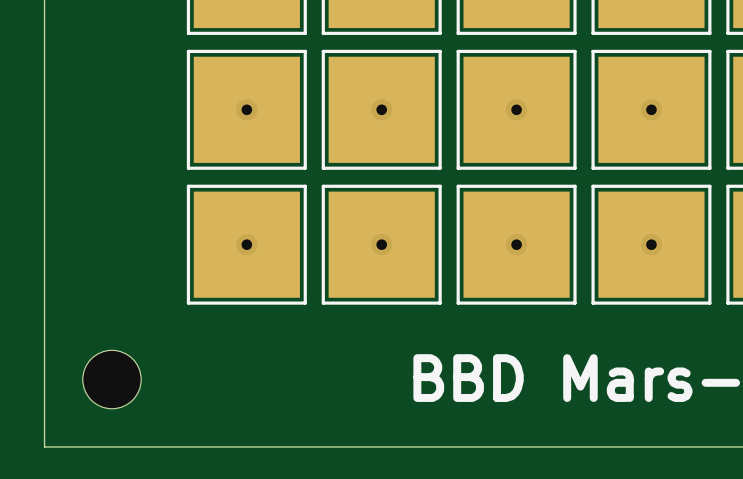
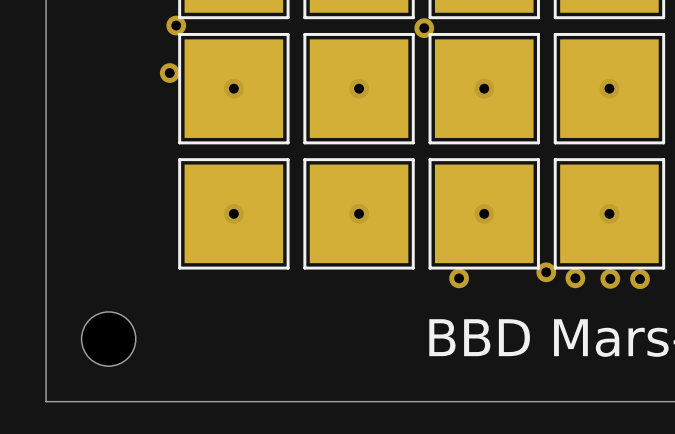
via: none -> (176, 25)
via: none -> (424, 28)
via: none -> (169, 73)
via: none -> (546, 272)
via: none -> (459, 278)
via: none -> (575, 278)
via: none -> (610, 278)
via: none -> (640, 279)

